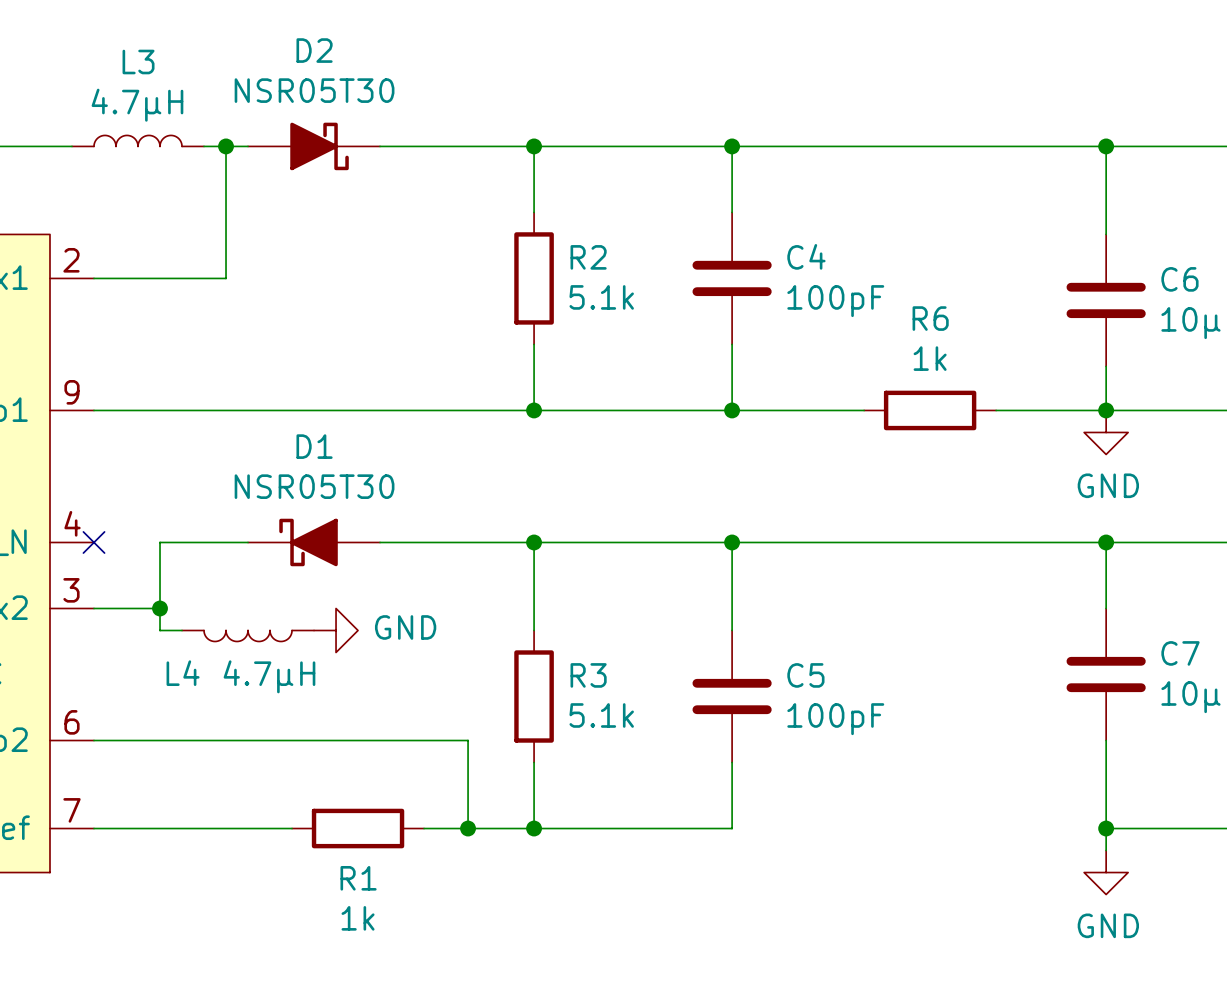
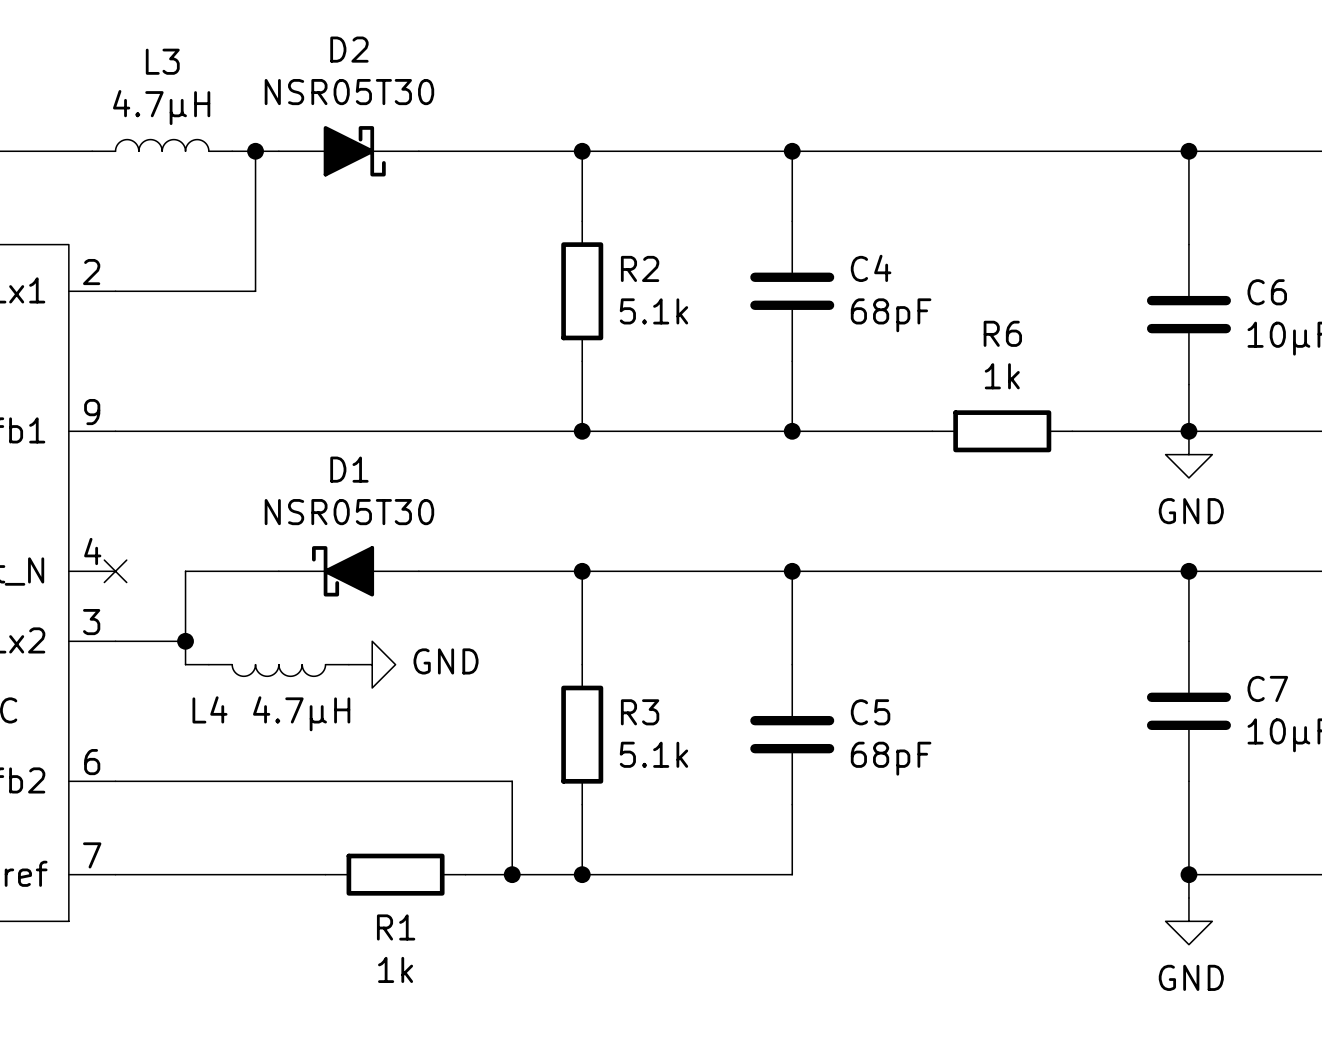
C4 value: 100pF (835, 301) -> 68pF (891, 315)
C5 value: 100pF (835, 719) -> 68pF (891, 758)

